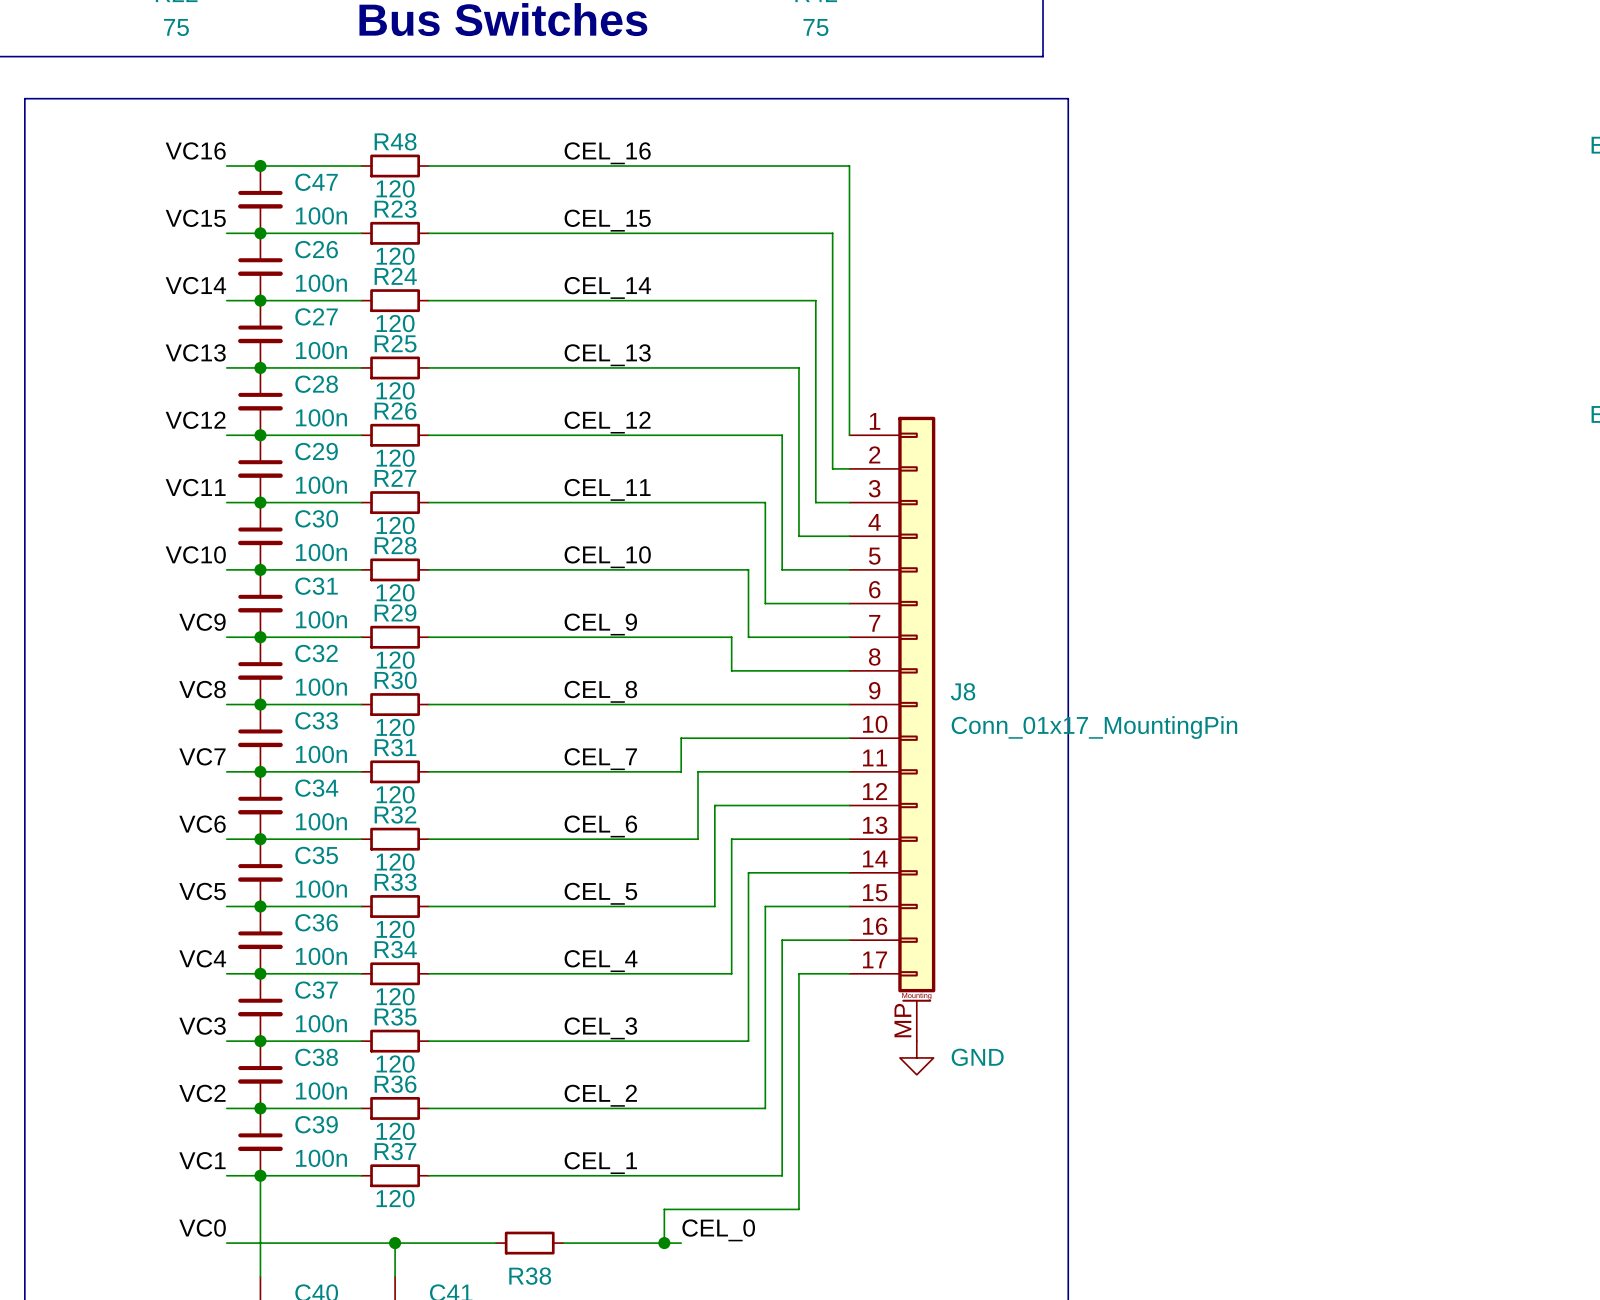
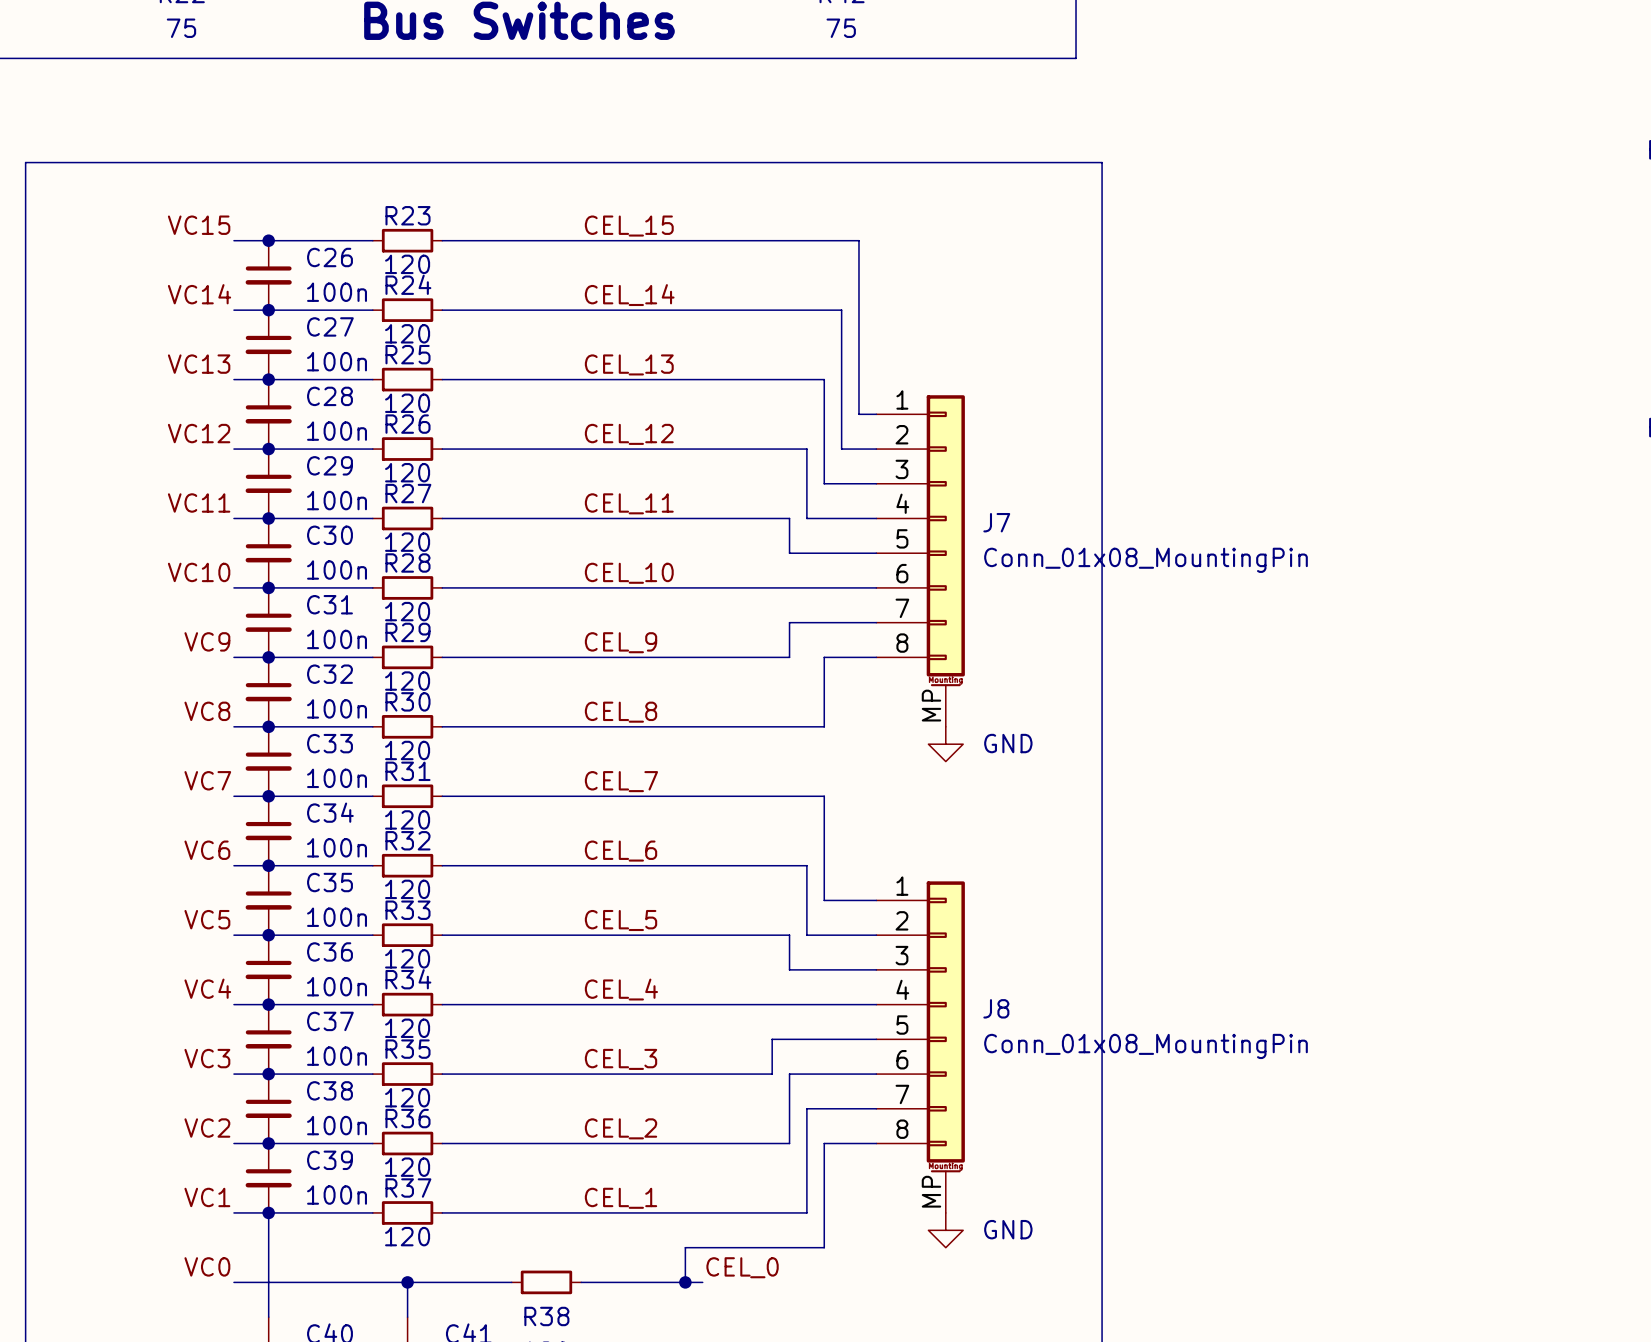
label: VC16 (195, 150) -> none
label: CEL_16 (607, 153) -> none
line: (24, 157) (24, 98) (1068, 98) (1068, 157) -> (25, 162) (1102, 162)
wire: (226, 166) (361, 166) -> none
junction: (260, 166) -> none
R48: 120 (395, 166) -> none
wire: (428, 166) (849, 166) (849, 435) -> (841, 449) (876, 449)
C47: 100n (260, 199) -> none
wire: (832, 401) (832, 468) -> (858, 414) (876, 414)
J8 symbol: [849, 416, 936, 1042] -> [876, 881, 965, 1213]
wire: (815, 435) (815, 502) -> (806, 518) (841, 518)
wire: (798, 468) (798, 536) -> (789, 553) (824, 553)
wire: none -> (824, 483) (858, 483)
wire: (782, 502) (782, 569) -> (772, 587) (806, 587)
wire: (765, 536) (765, 603) -> none
J7: none -> Conn_01x08_MountingPin (920, 561)
wire: (748, 569) (748, 637) -> (754, 657) (772, 657)
wire: (731, 637) (731, 670) (849, 670) -> none
wire: (765, 637) (798, 637) -> (789, 657) (789, 622)
wire: (798, 704) (849, 704) -> (824, 726) (824, 657)
power symbol: none -> GND (945, 744)
J8 value: Conn_01x17_MountingPin (1094, 727) -> Conn_01x08_MountingPin (1146, 1046)
wire: (849, 738) (681, 738) (681, 771) -> none
wire: (698, 771) (698, 839) -> (720, 796) (702, 796)
wire: (798, 771) (849, 771) -> (824, 796) (824, 900)
wire: (849, 805) (714, 805) (714, 906) -> none
wire: (731, 839) (731, 973) -> (754, 865) (720, 865)
wire: (782, 839) (849, 839) -> (806, 865) (806, 935)
wire: (798, 872) (748, 872) (748, 1007) -> (876, 1039) (772, 1039)
wire: (765, 906) (782, 906) -> (789, 935) (737, 935)
wire: (765, 940) (765, 1041) -> (789, 969) (806, 969)
wire: (782, 940) (782, 1074) -> (876, 1108) (806, 1108)
wire: none -> (754, 1004) (824, 1004)
wire: (798, 973) (798, 1108) -> (876, 1143) (824, 1143)
wire: none -> (789, 1074) (876, 1074)
power symbol position: GND (916, 1057) -> GND (945, 1230)

